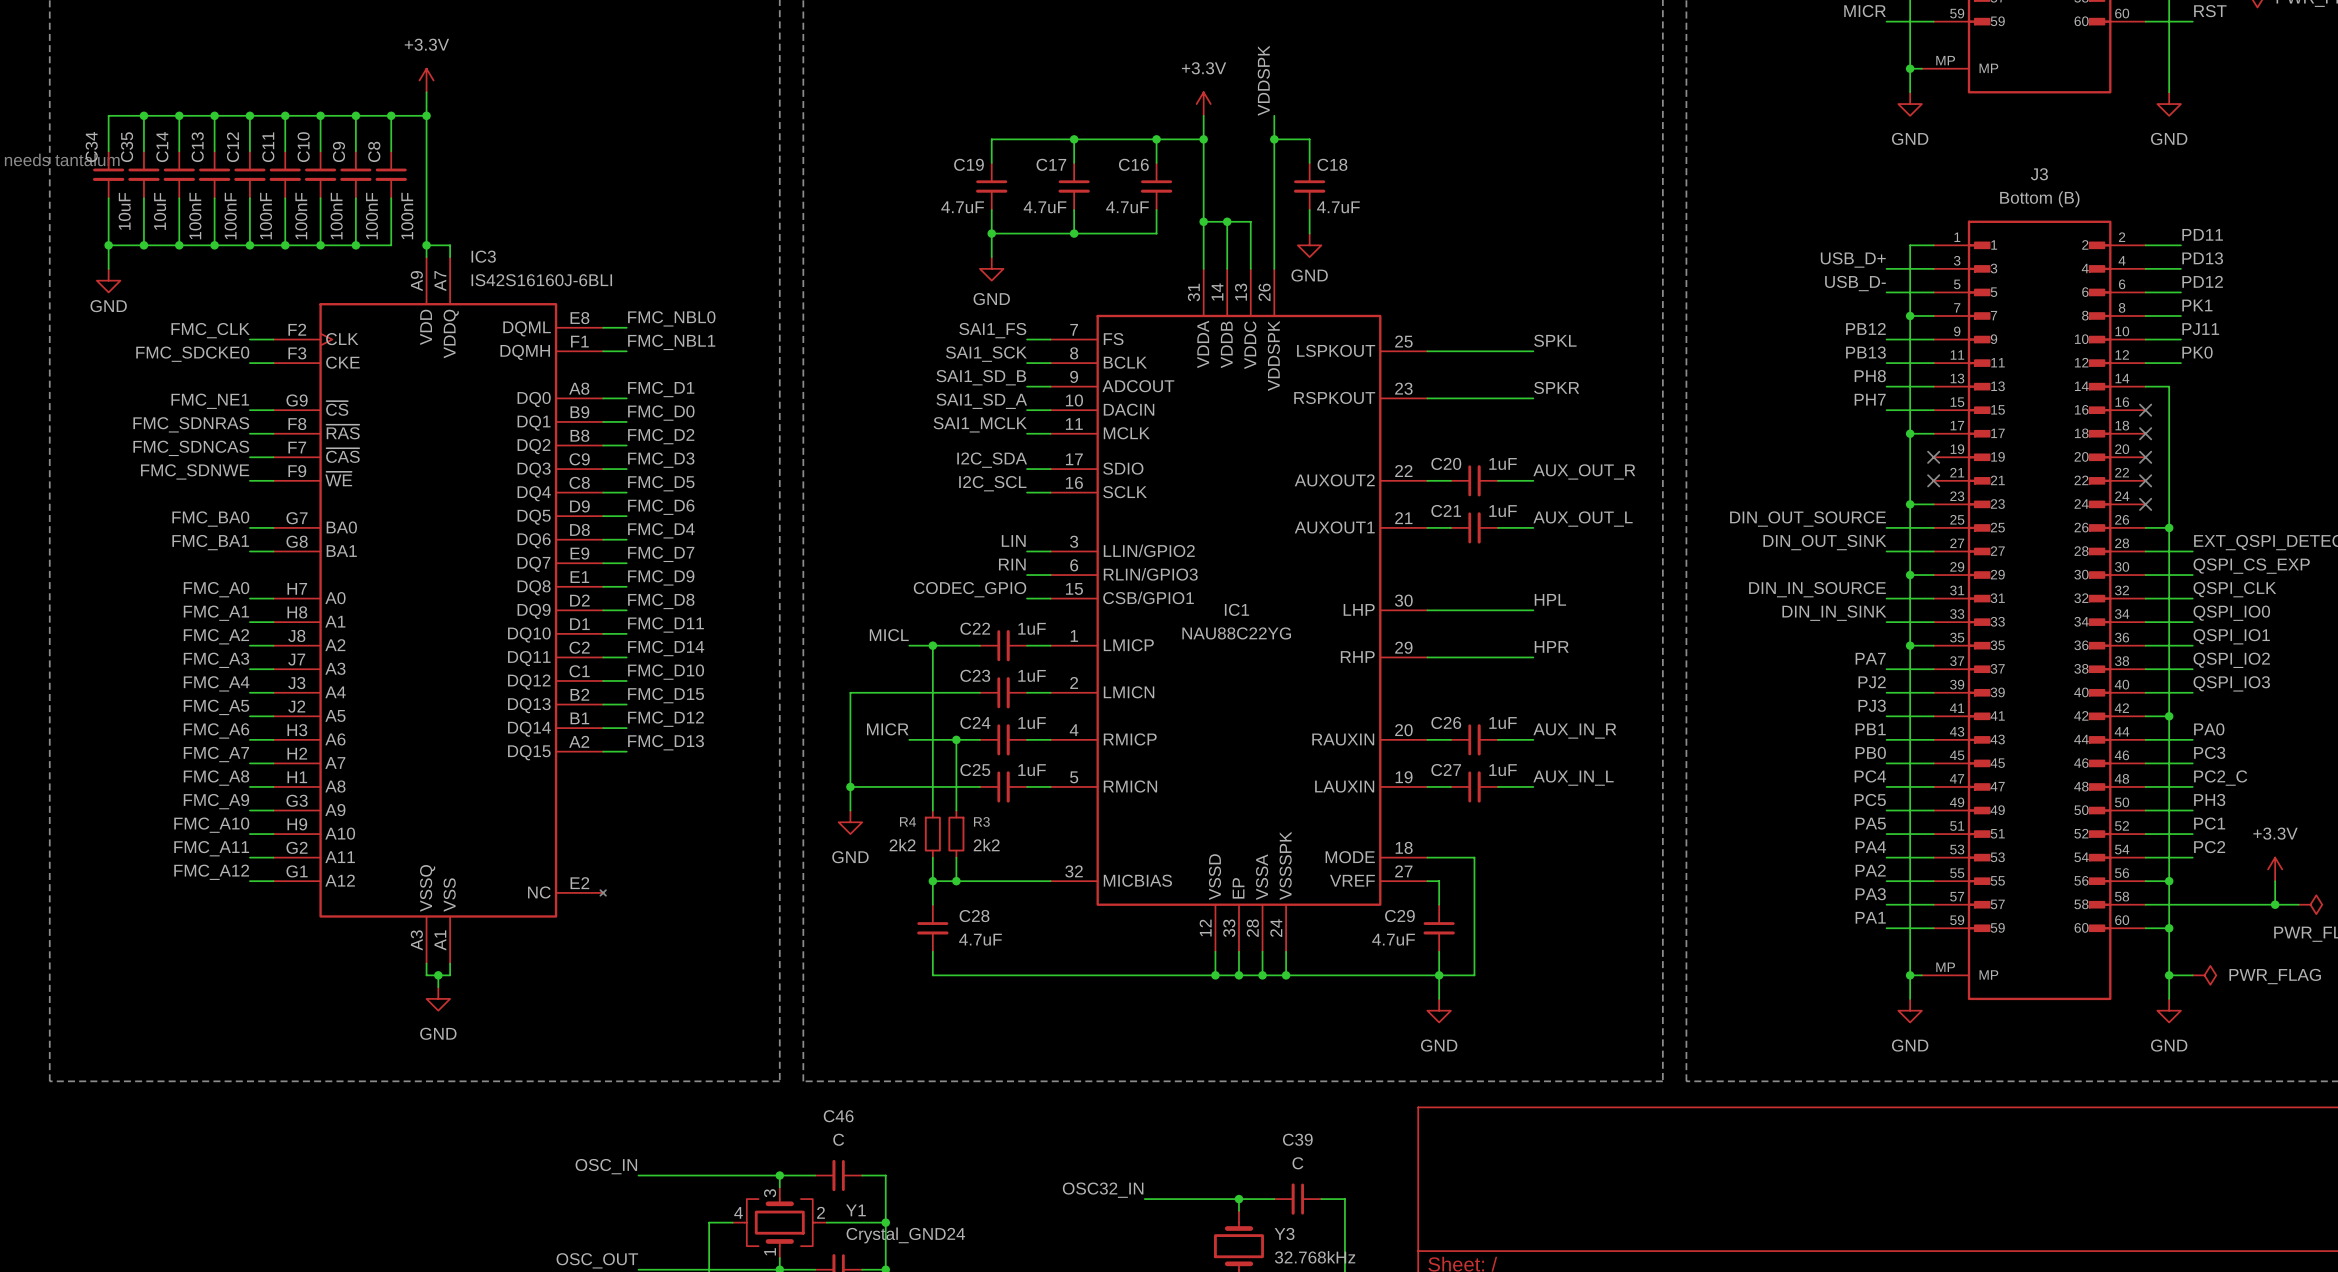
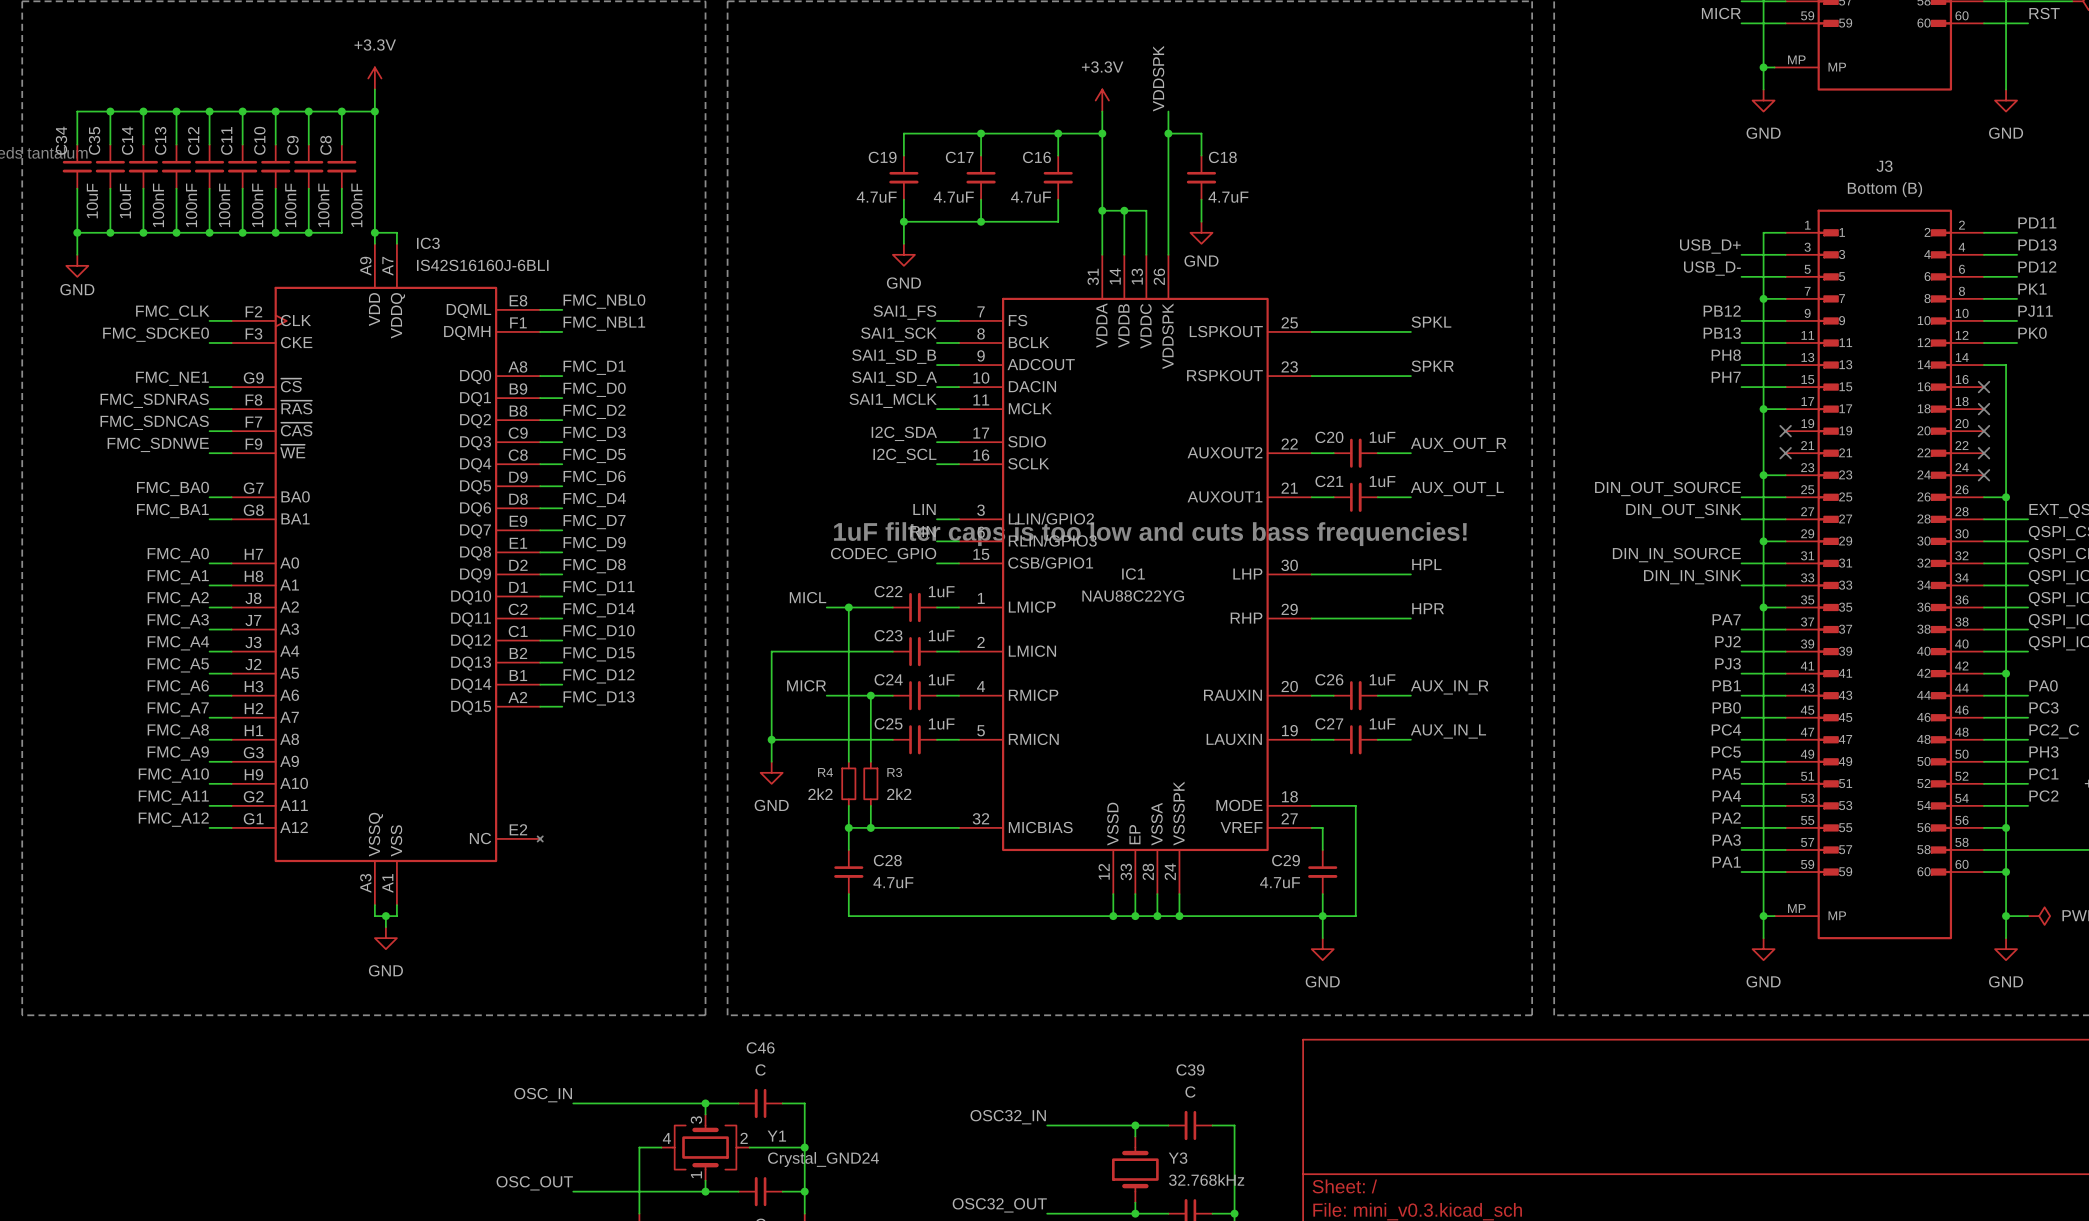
text: none -> 1uF filter caps is too low and cuts bass frequencies! (1150, 534)

